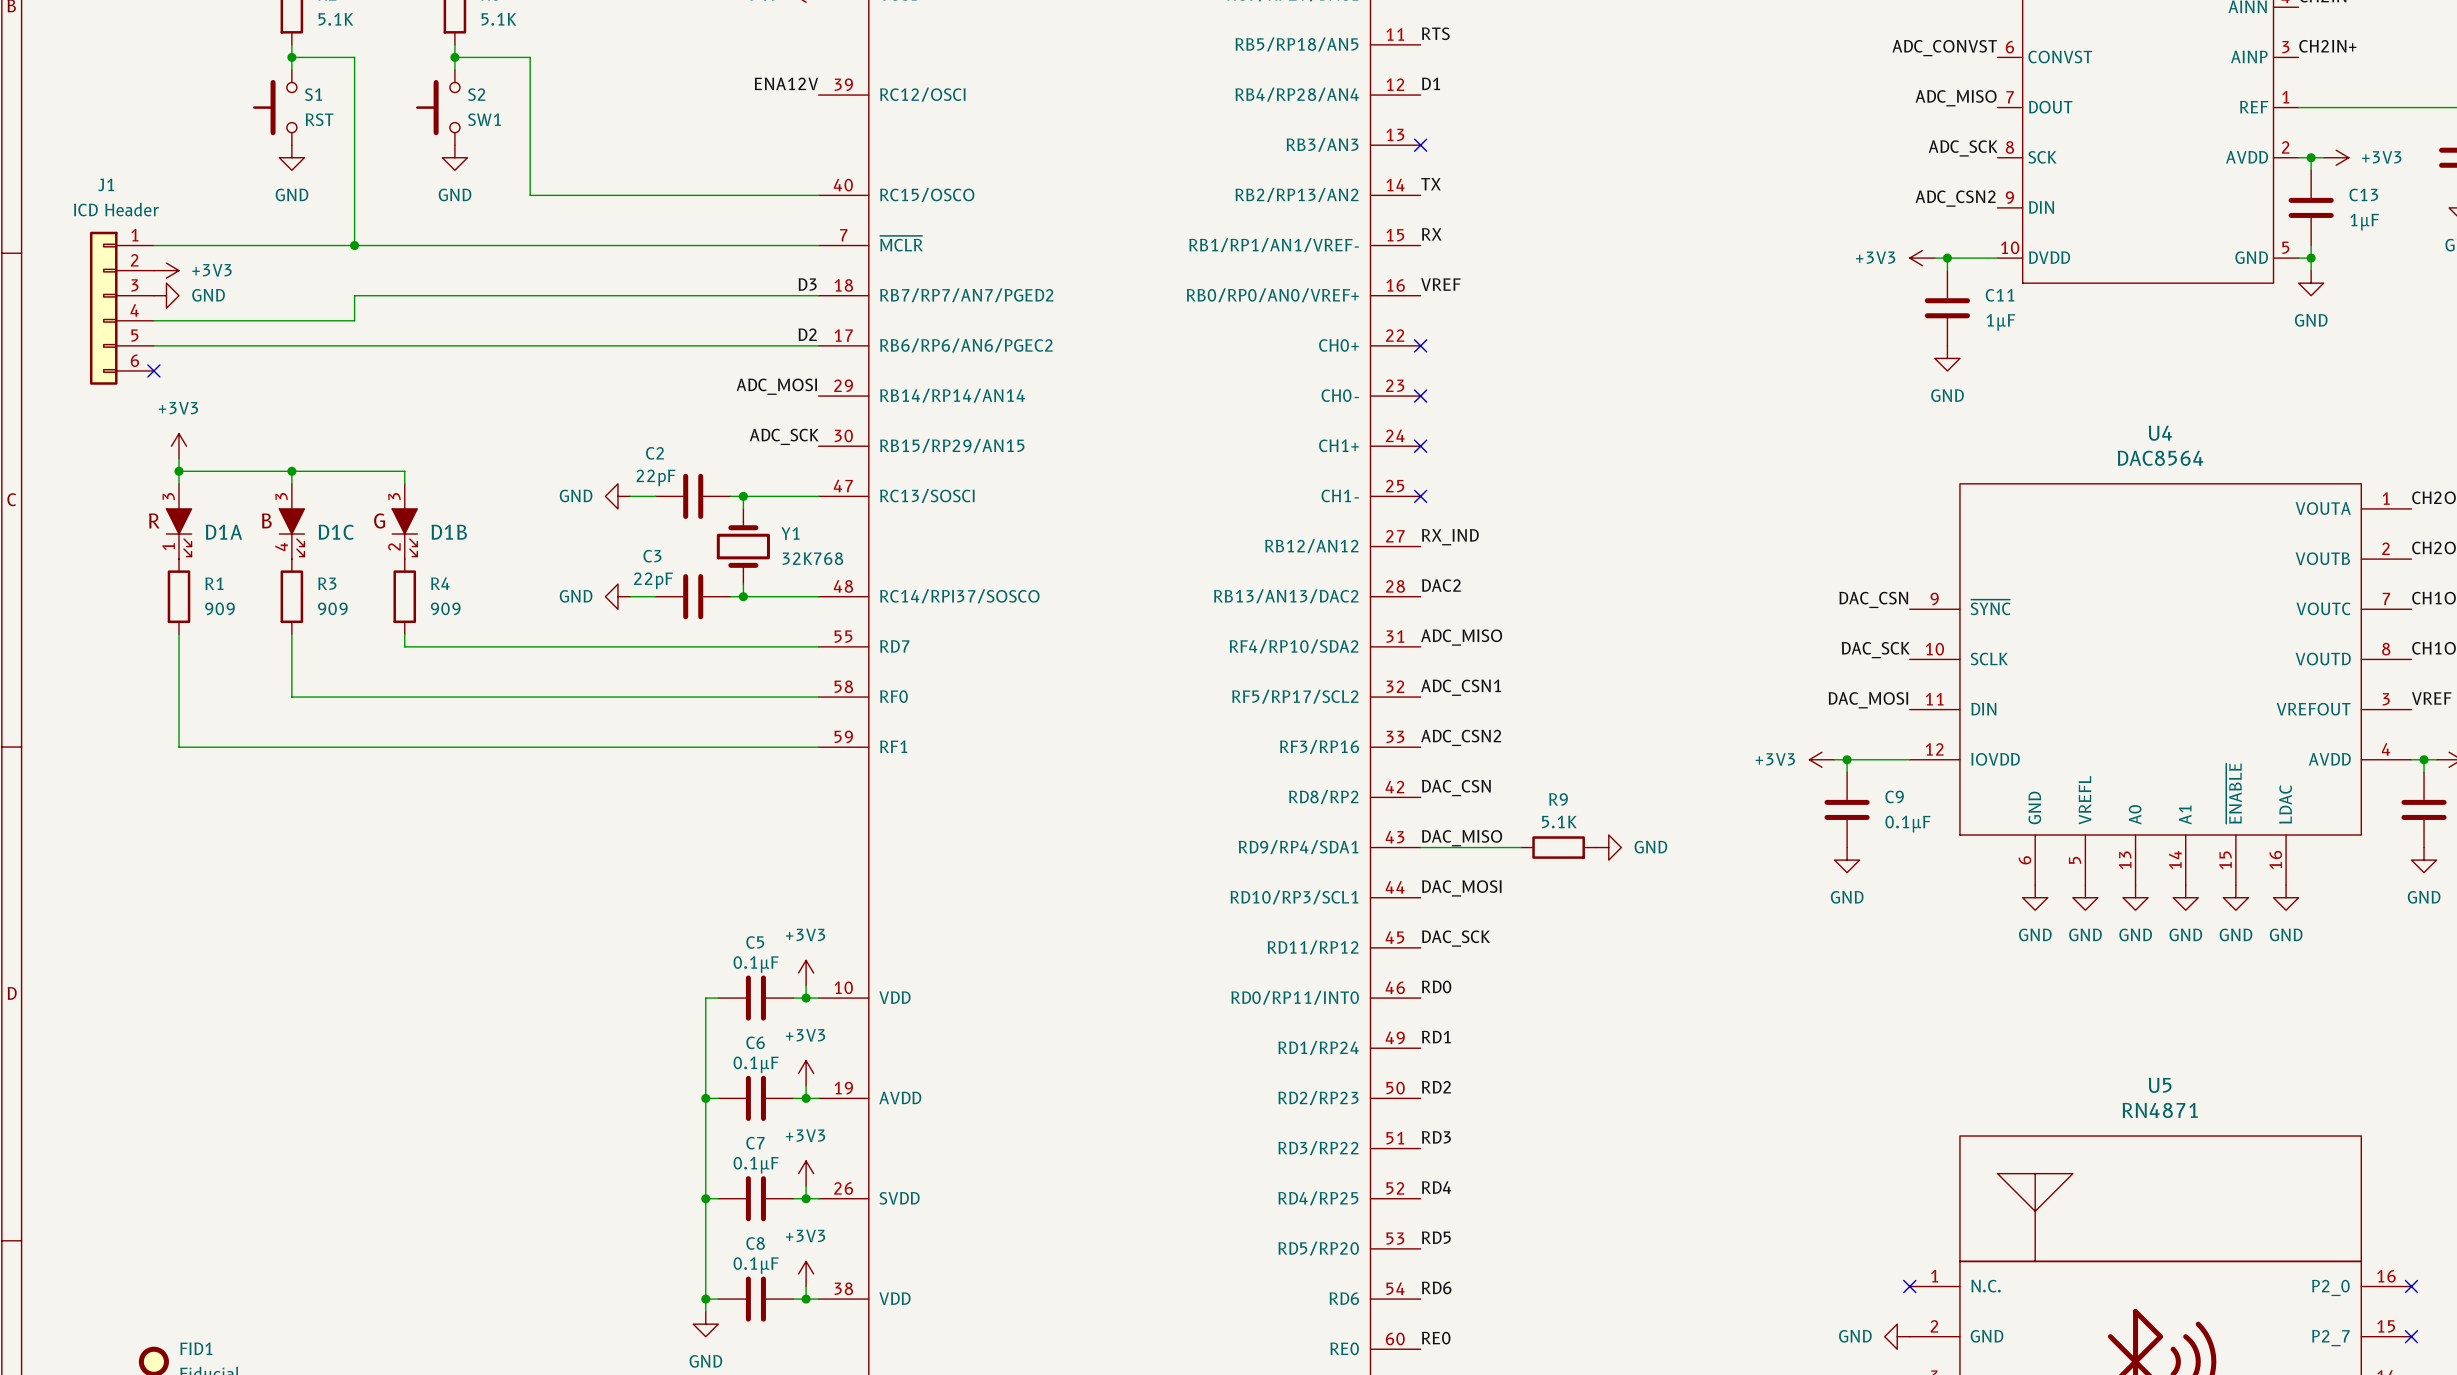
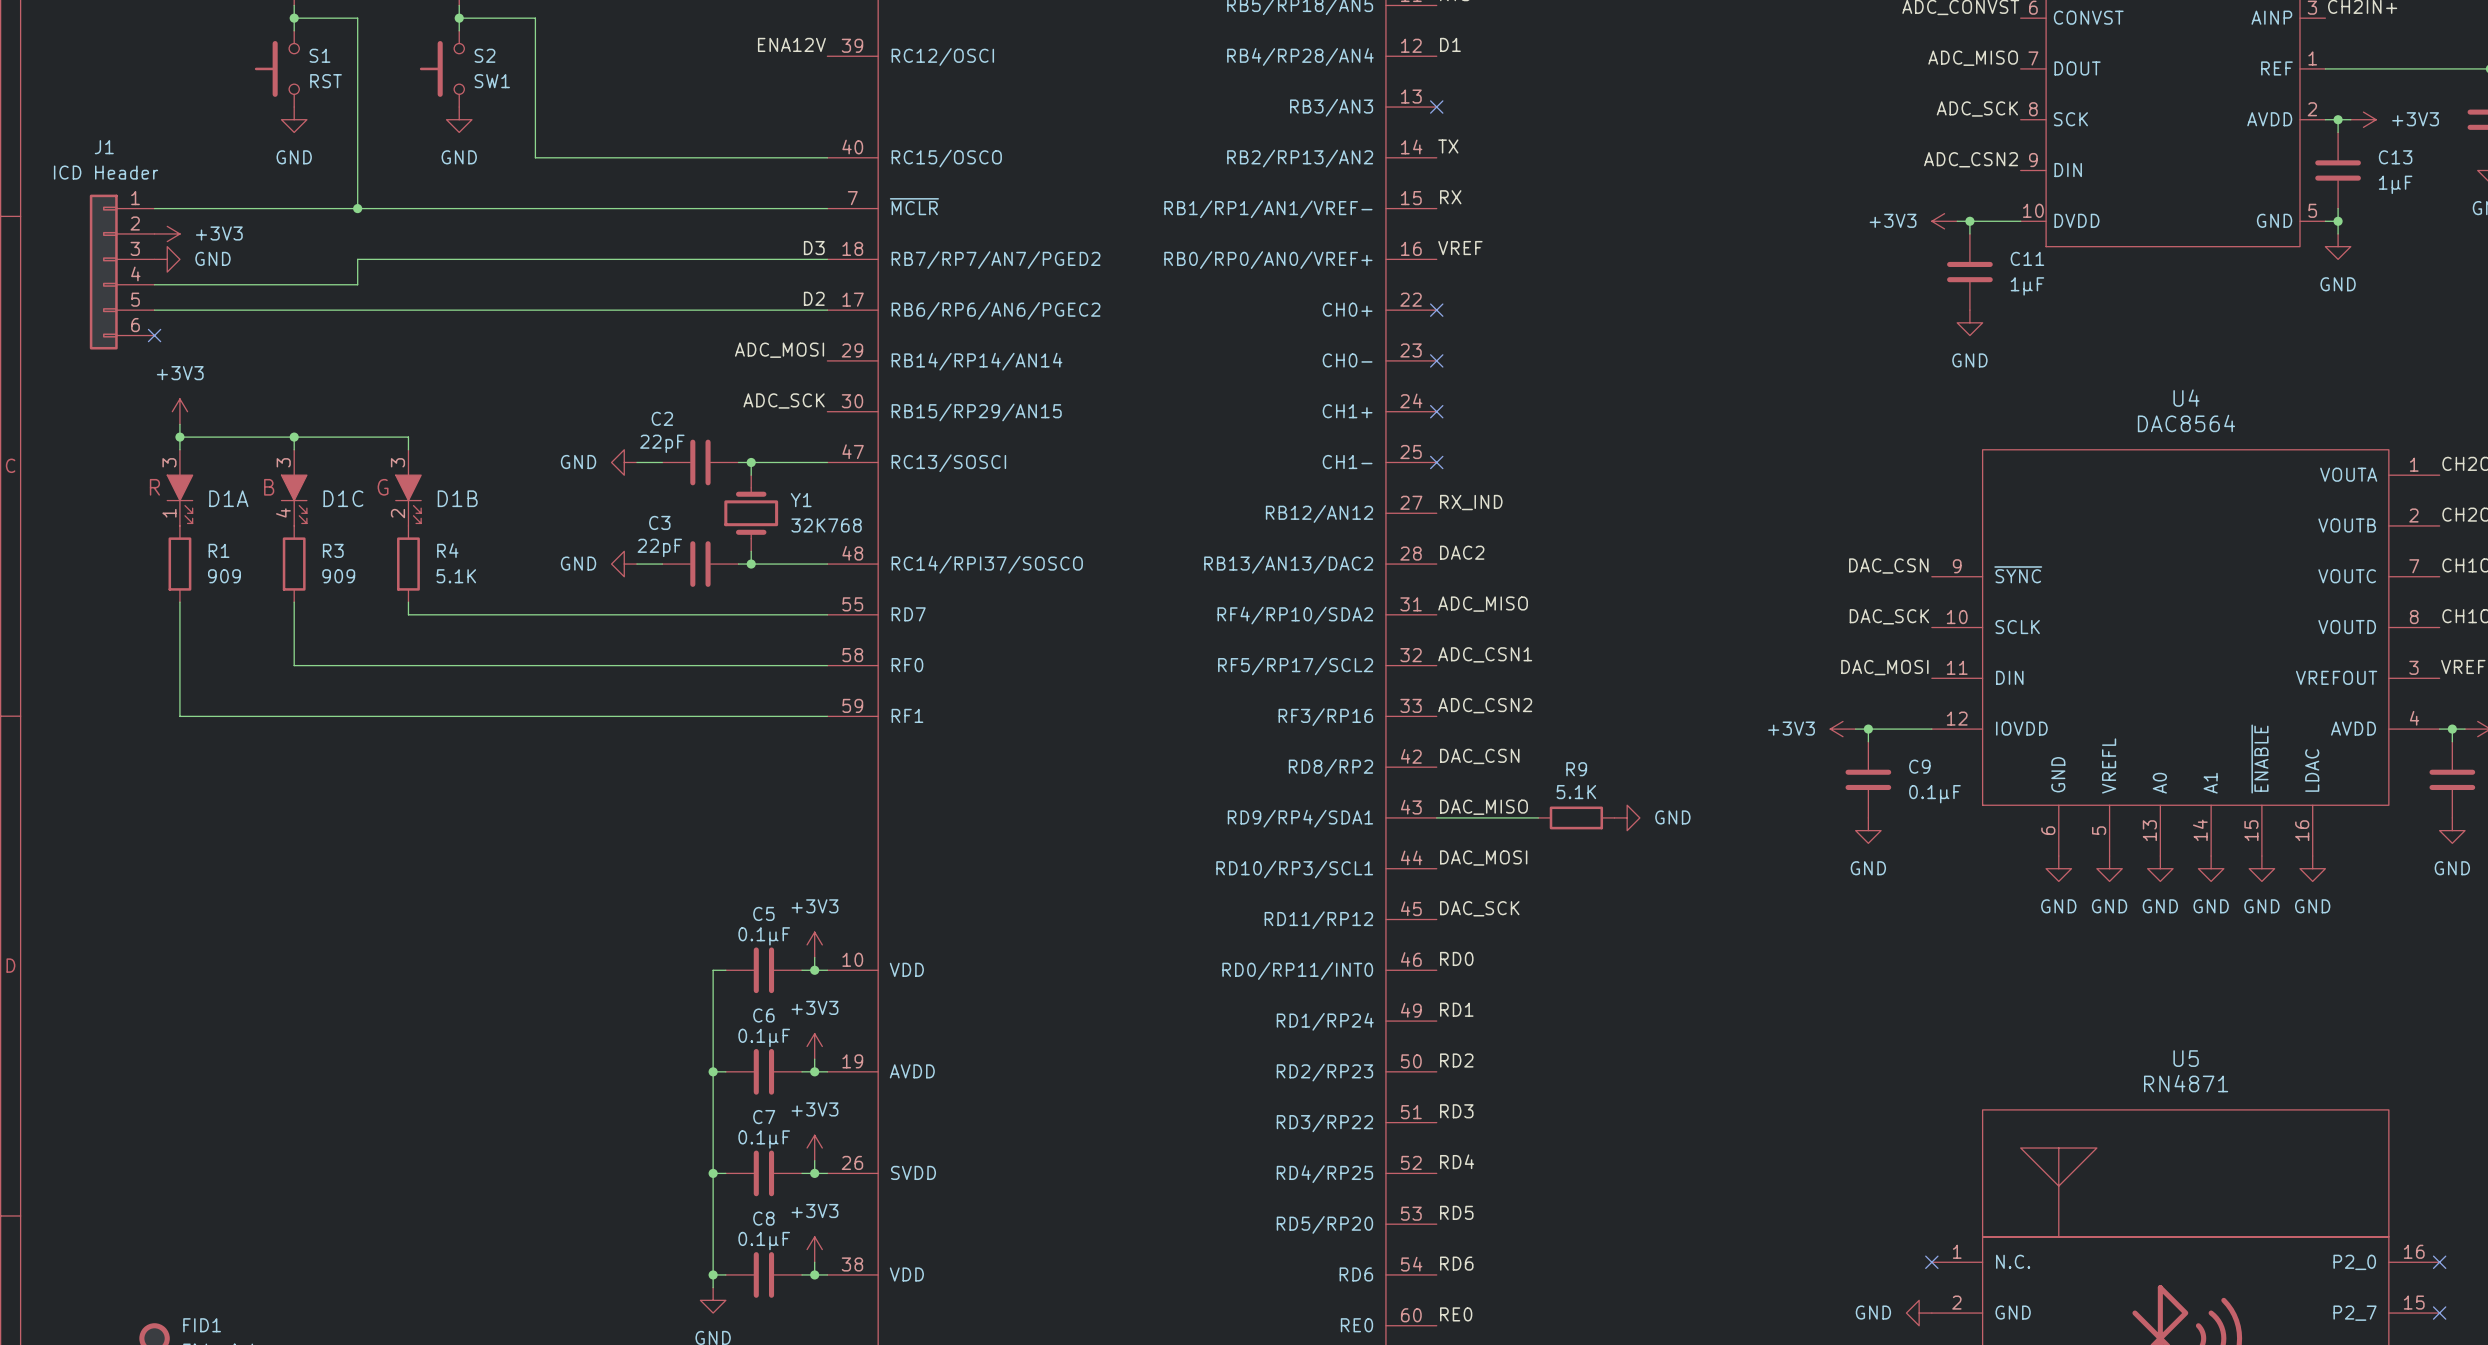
R4 value: 909 (445, 608) -> 5.1K (456, 576)

